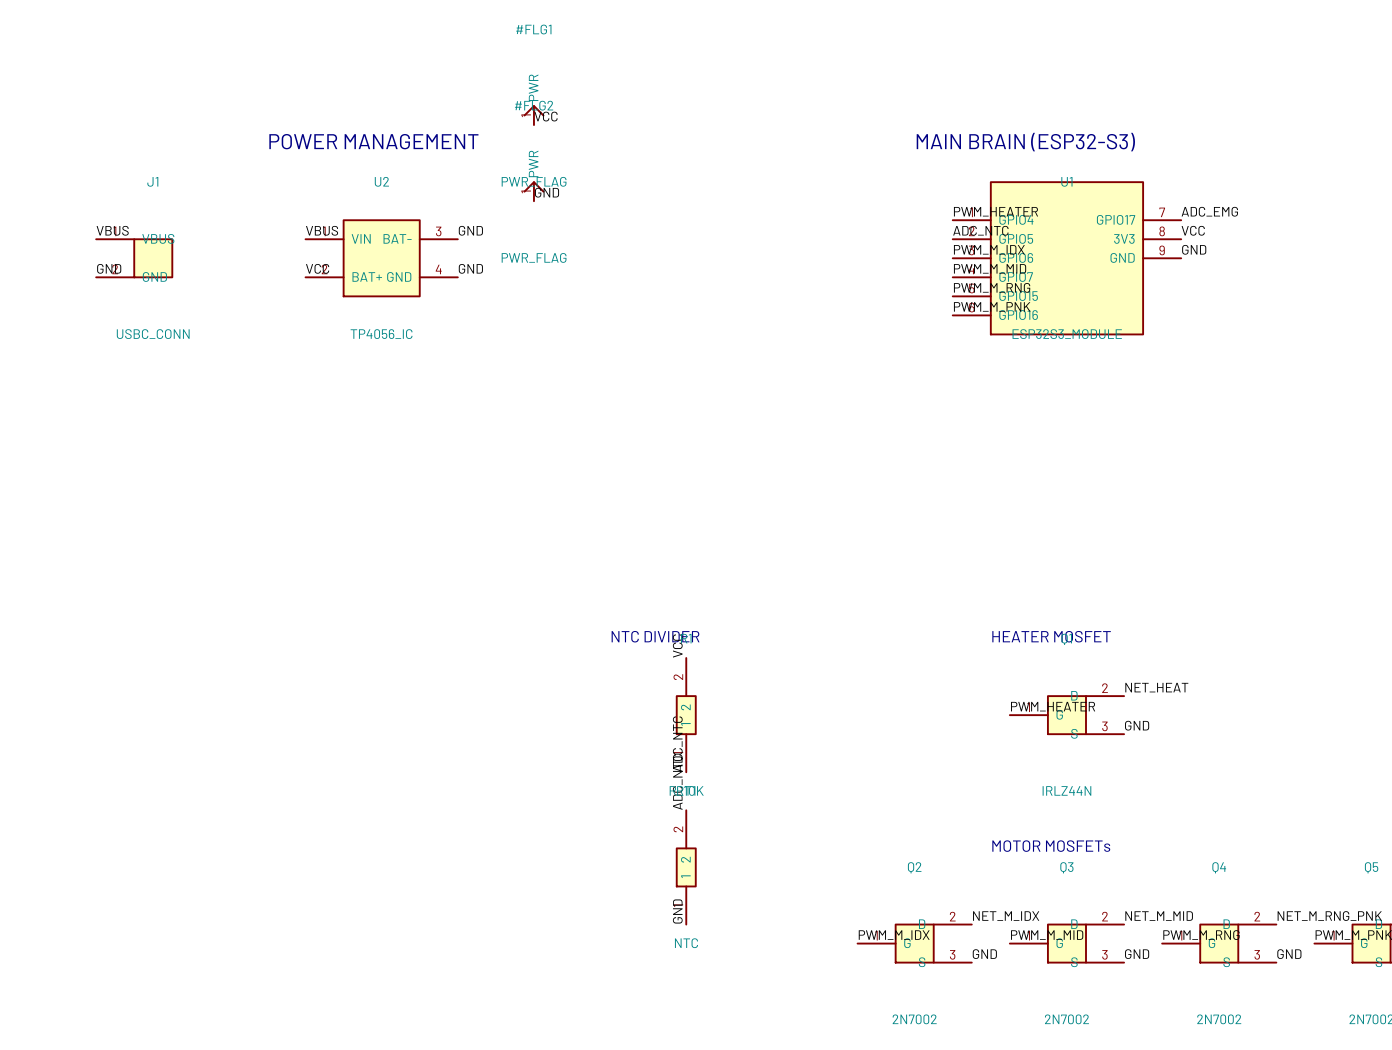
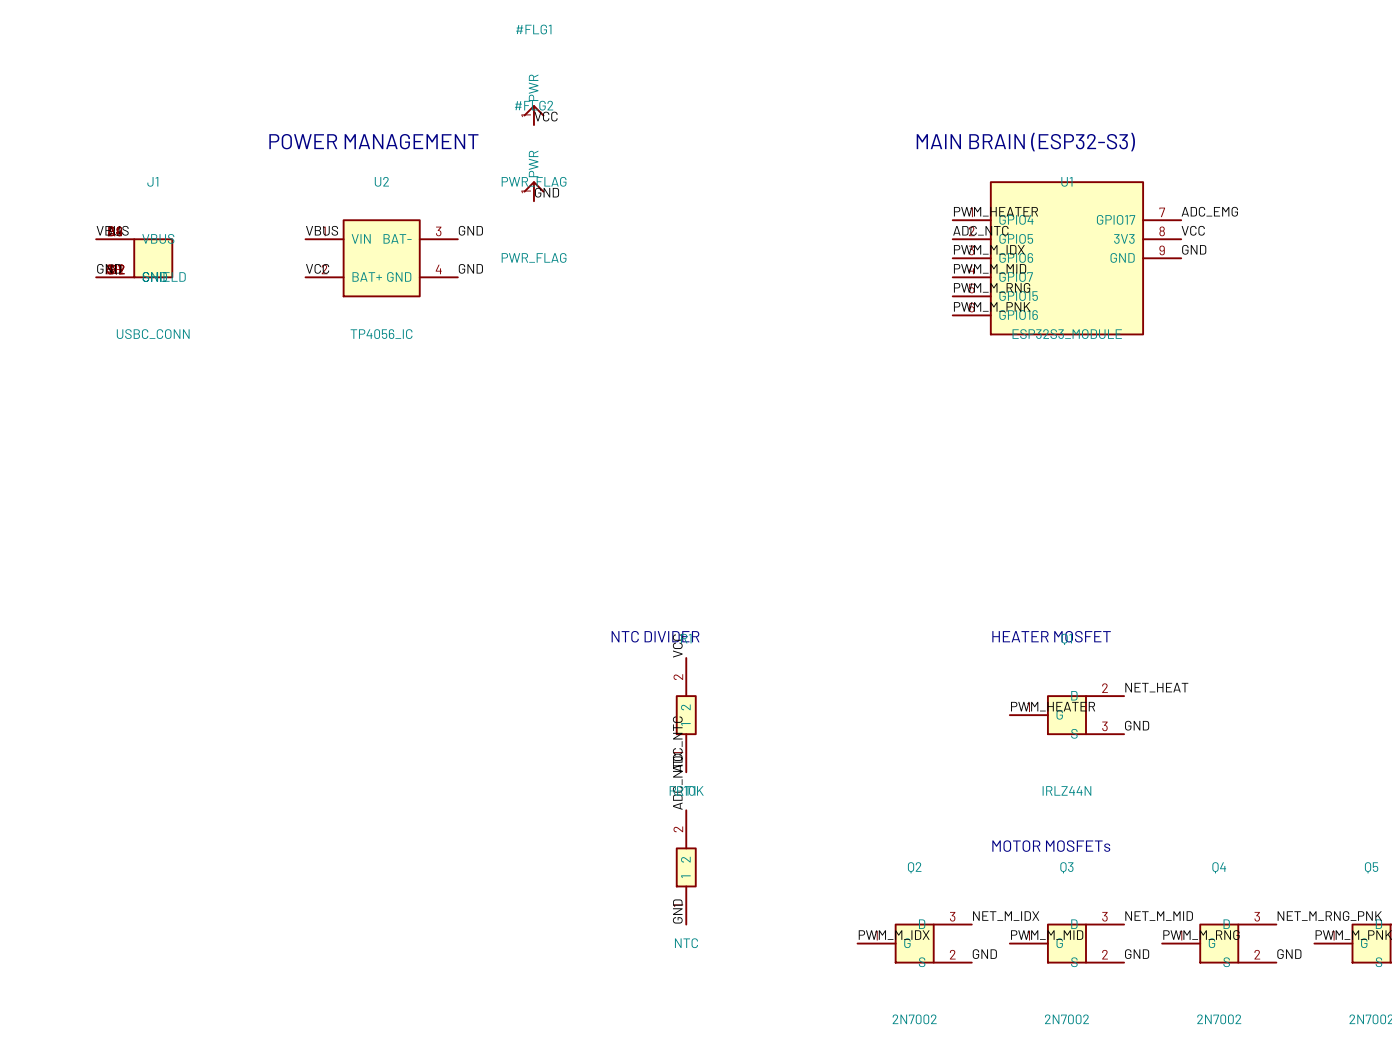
J1 symbol: [96, 239, 173, 278] -> [96, 239, 173, 278]
Q2 pin number: 2 (952, 916) -> 3 (952, 916)
Q3 pin number: 2 (1105, 916) -> 3 (1104, 916)
Q4 pin number: 2 (1257, 916) -> 3 (1257, 916)
Q2 pin number: 3 (952, 954) -> 2 (952, 954)
Q3 pin number: 3 (1104, 954) -> 2 (1105, 954)
Q4 pin number: 3 (1257, 954) -> 2 (1257, 954)

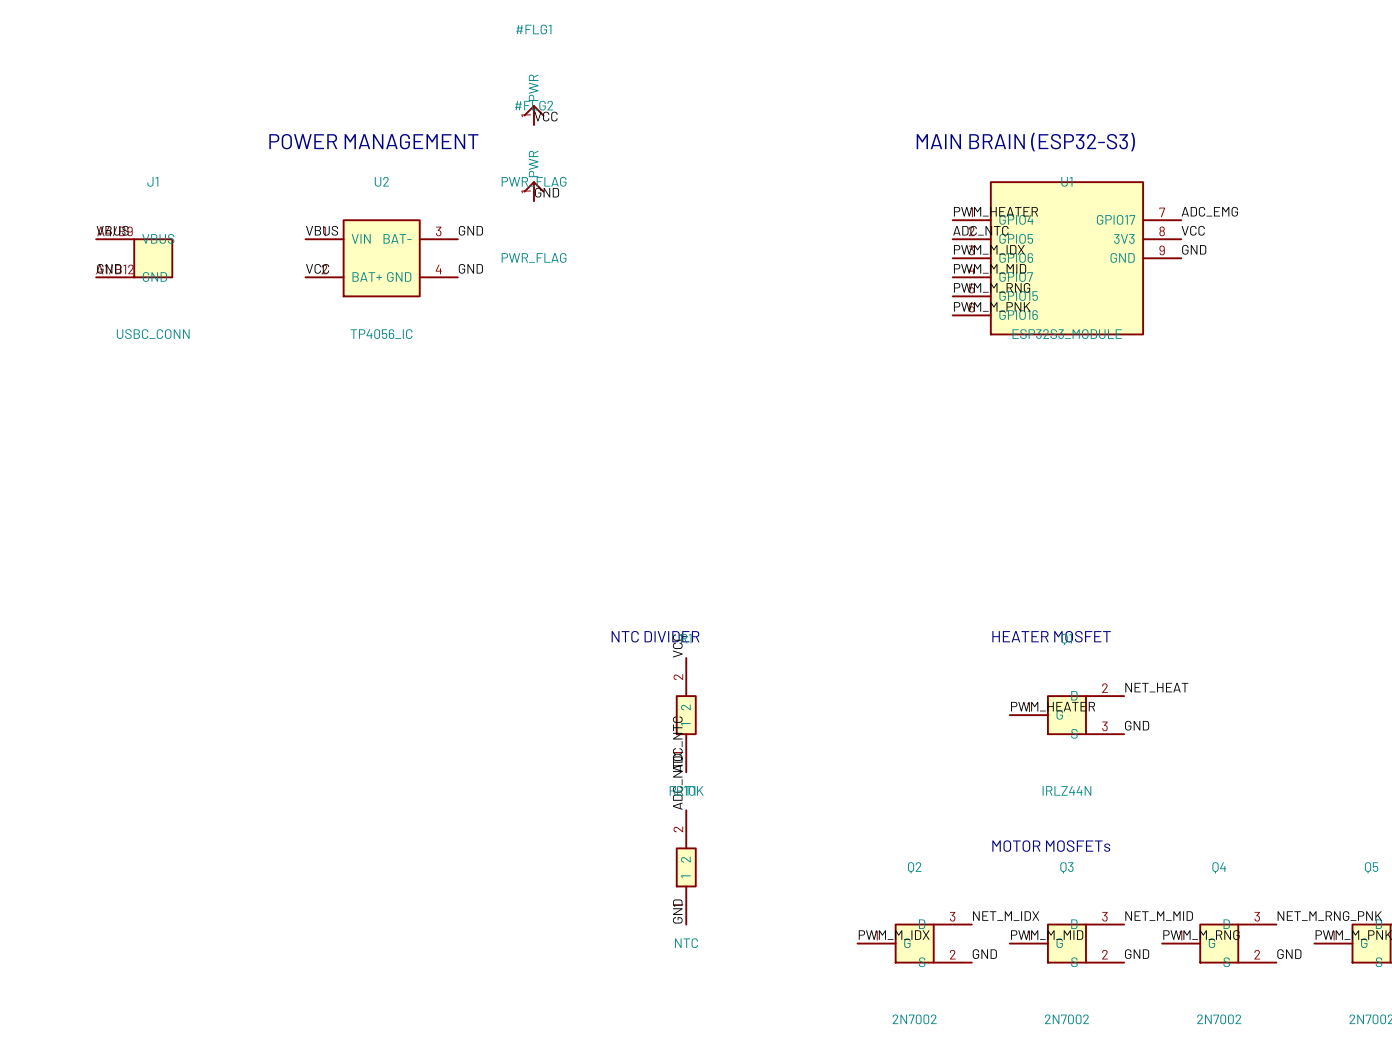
J1 symbol: [96, 239, 173, 278] -> [96, 239, 173, 278]

